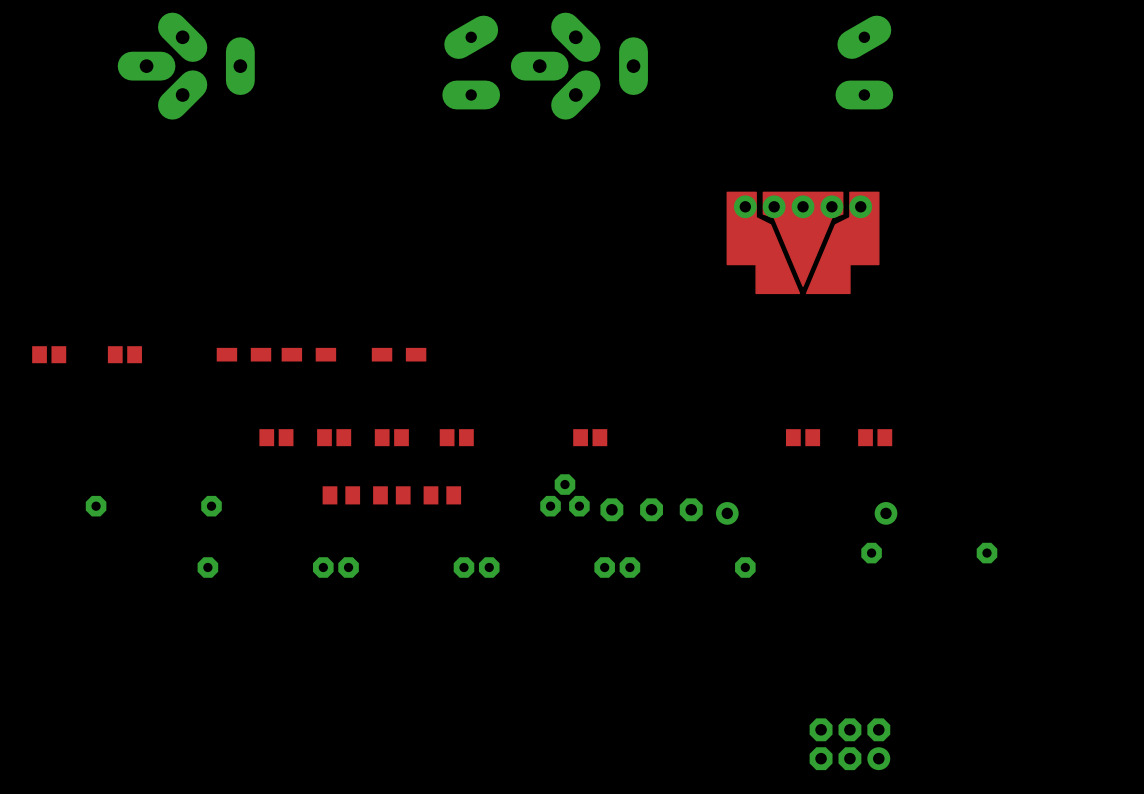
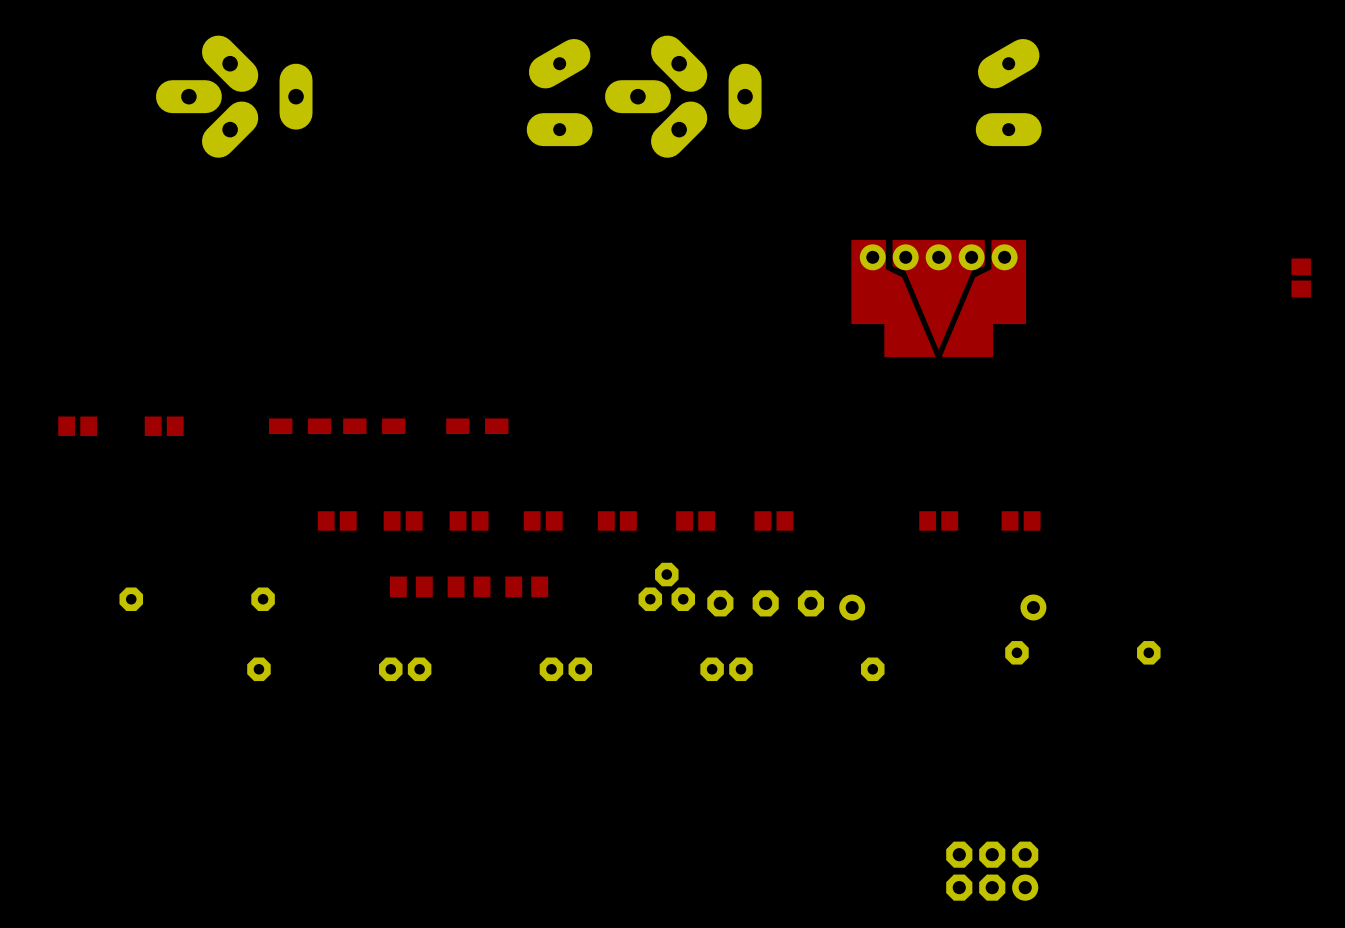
part: none -> (1301, 277)
part: none -> (617, 520)
part: none -> (773, 520)

